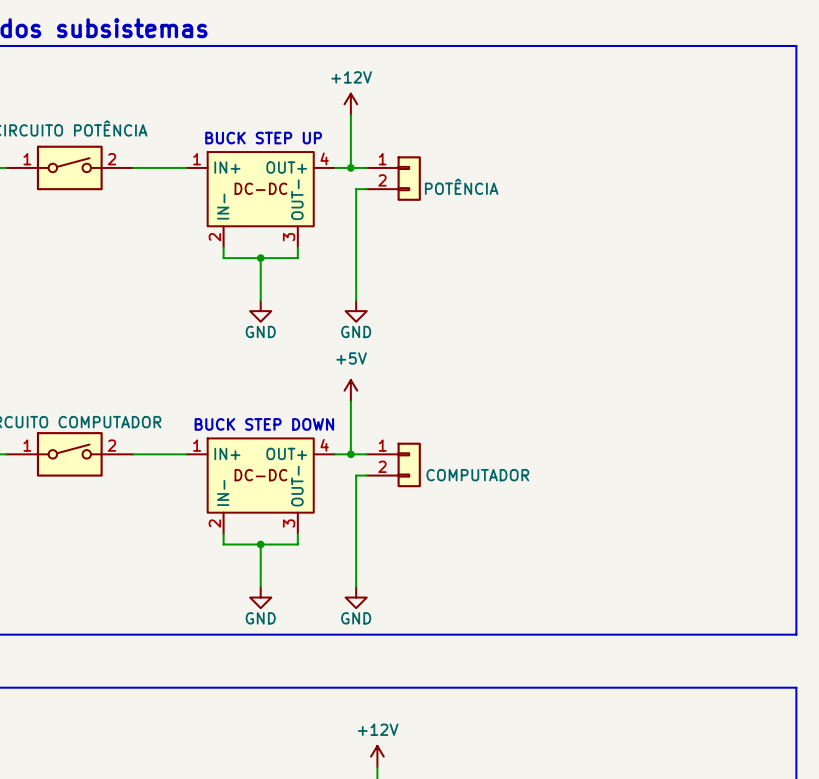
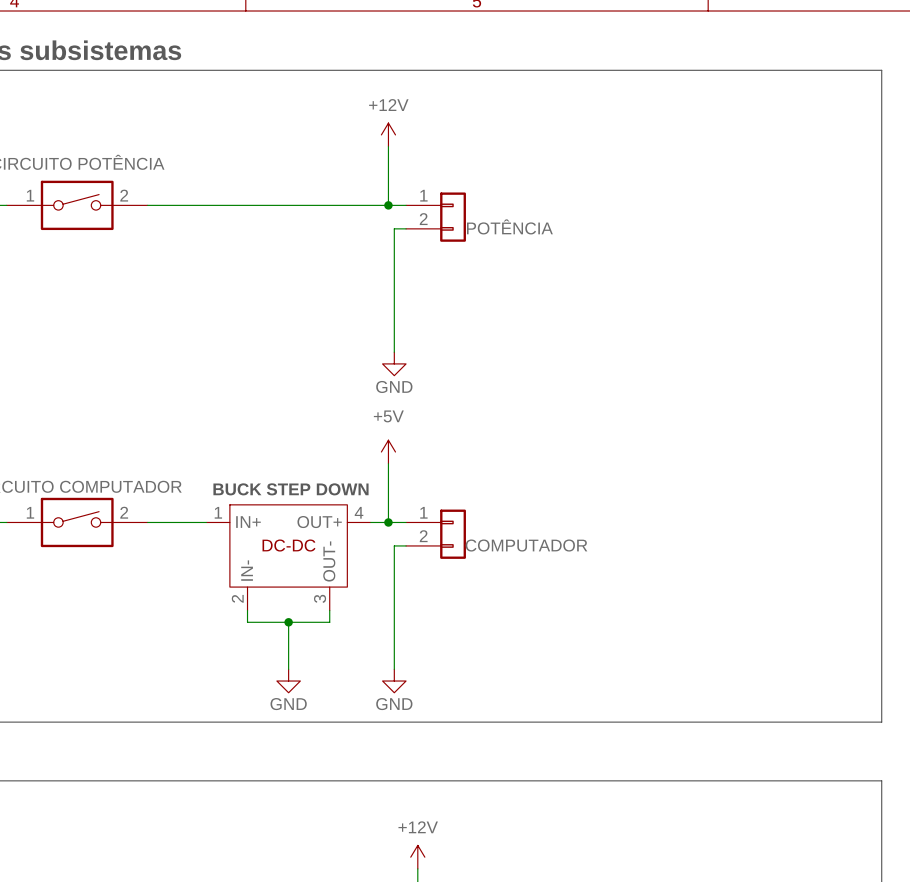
text: BUCK STEP UP (263, 138) -> none
part: (260, 199) -> none
wire: (223, 247) (223, 258) (297, 258) (297, 247) -> none
wire: (260, 258) (260, 300) -> none
junction: (260, 258) -> none
power symbol: GND (260, 311) -> none

